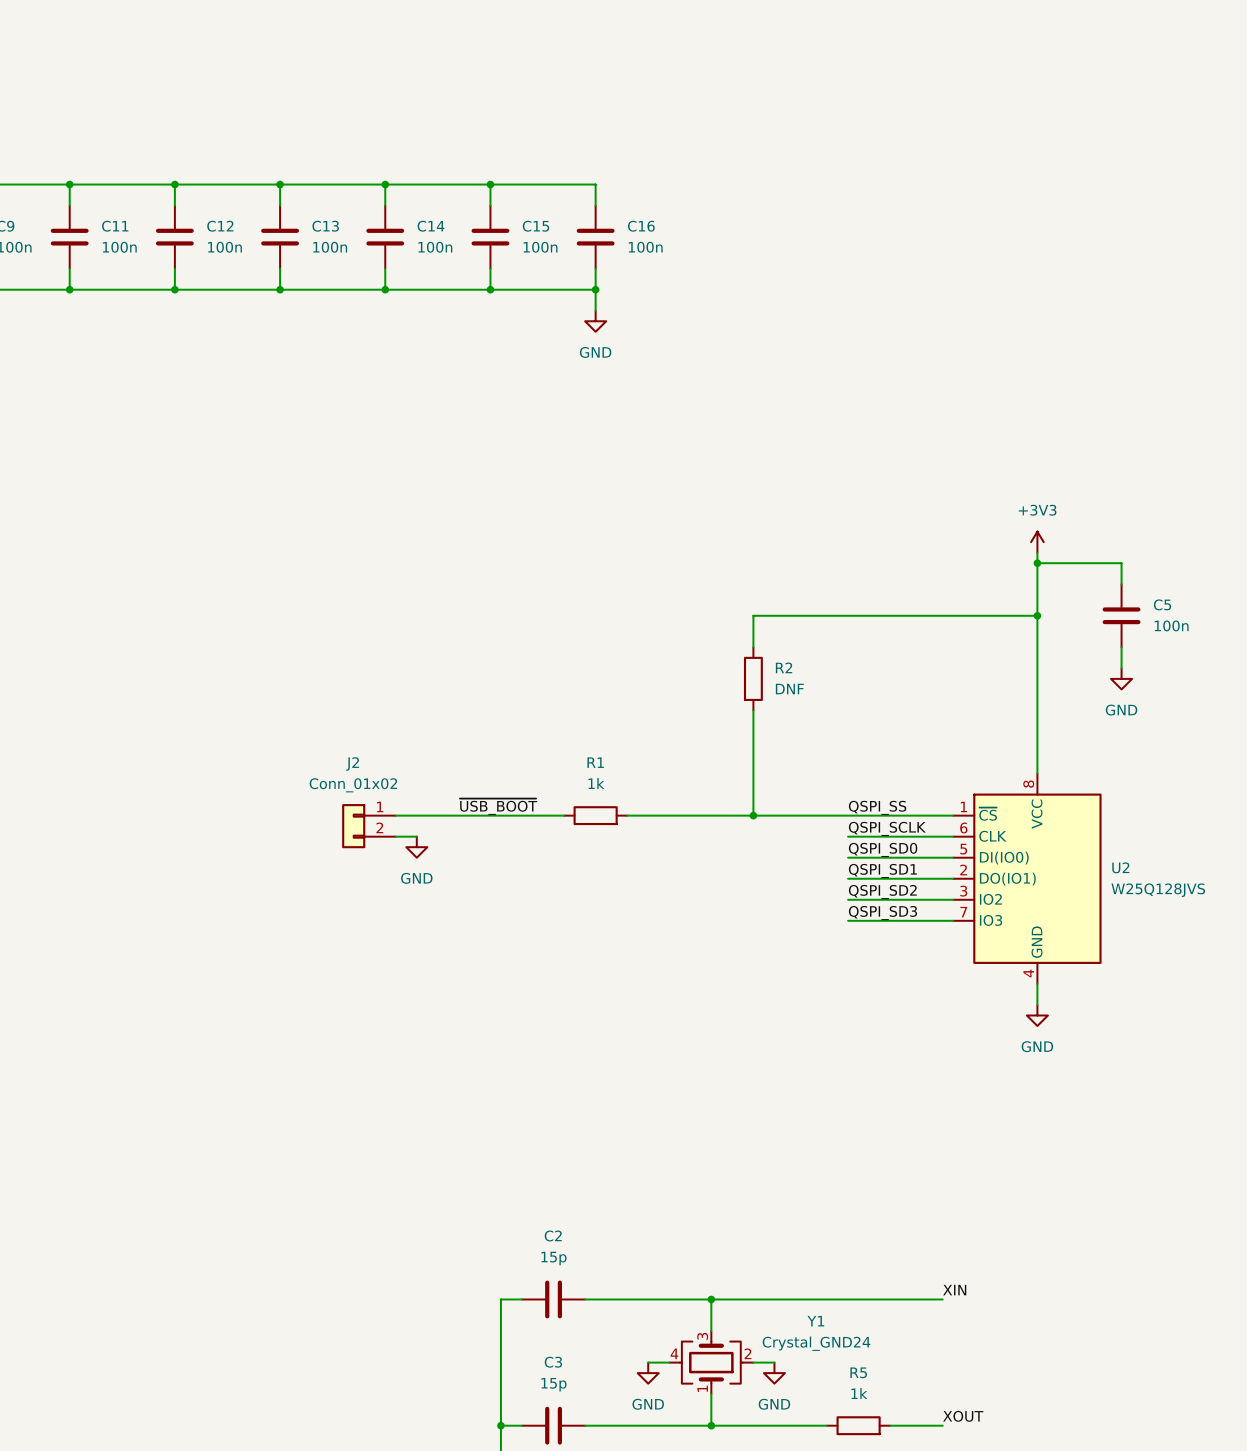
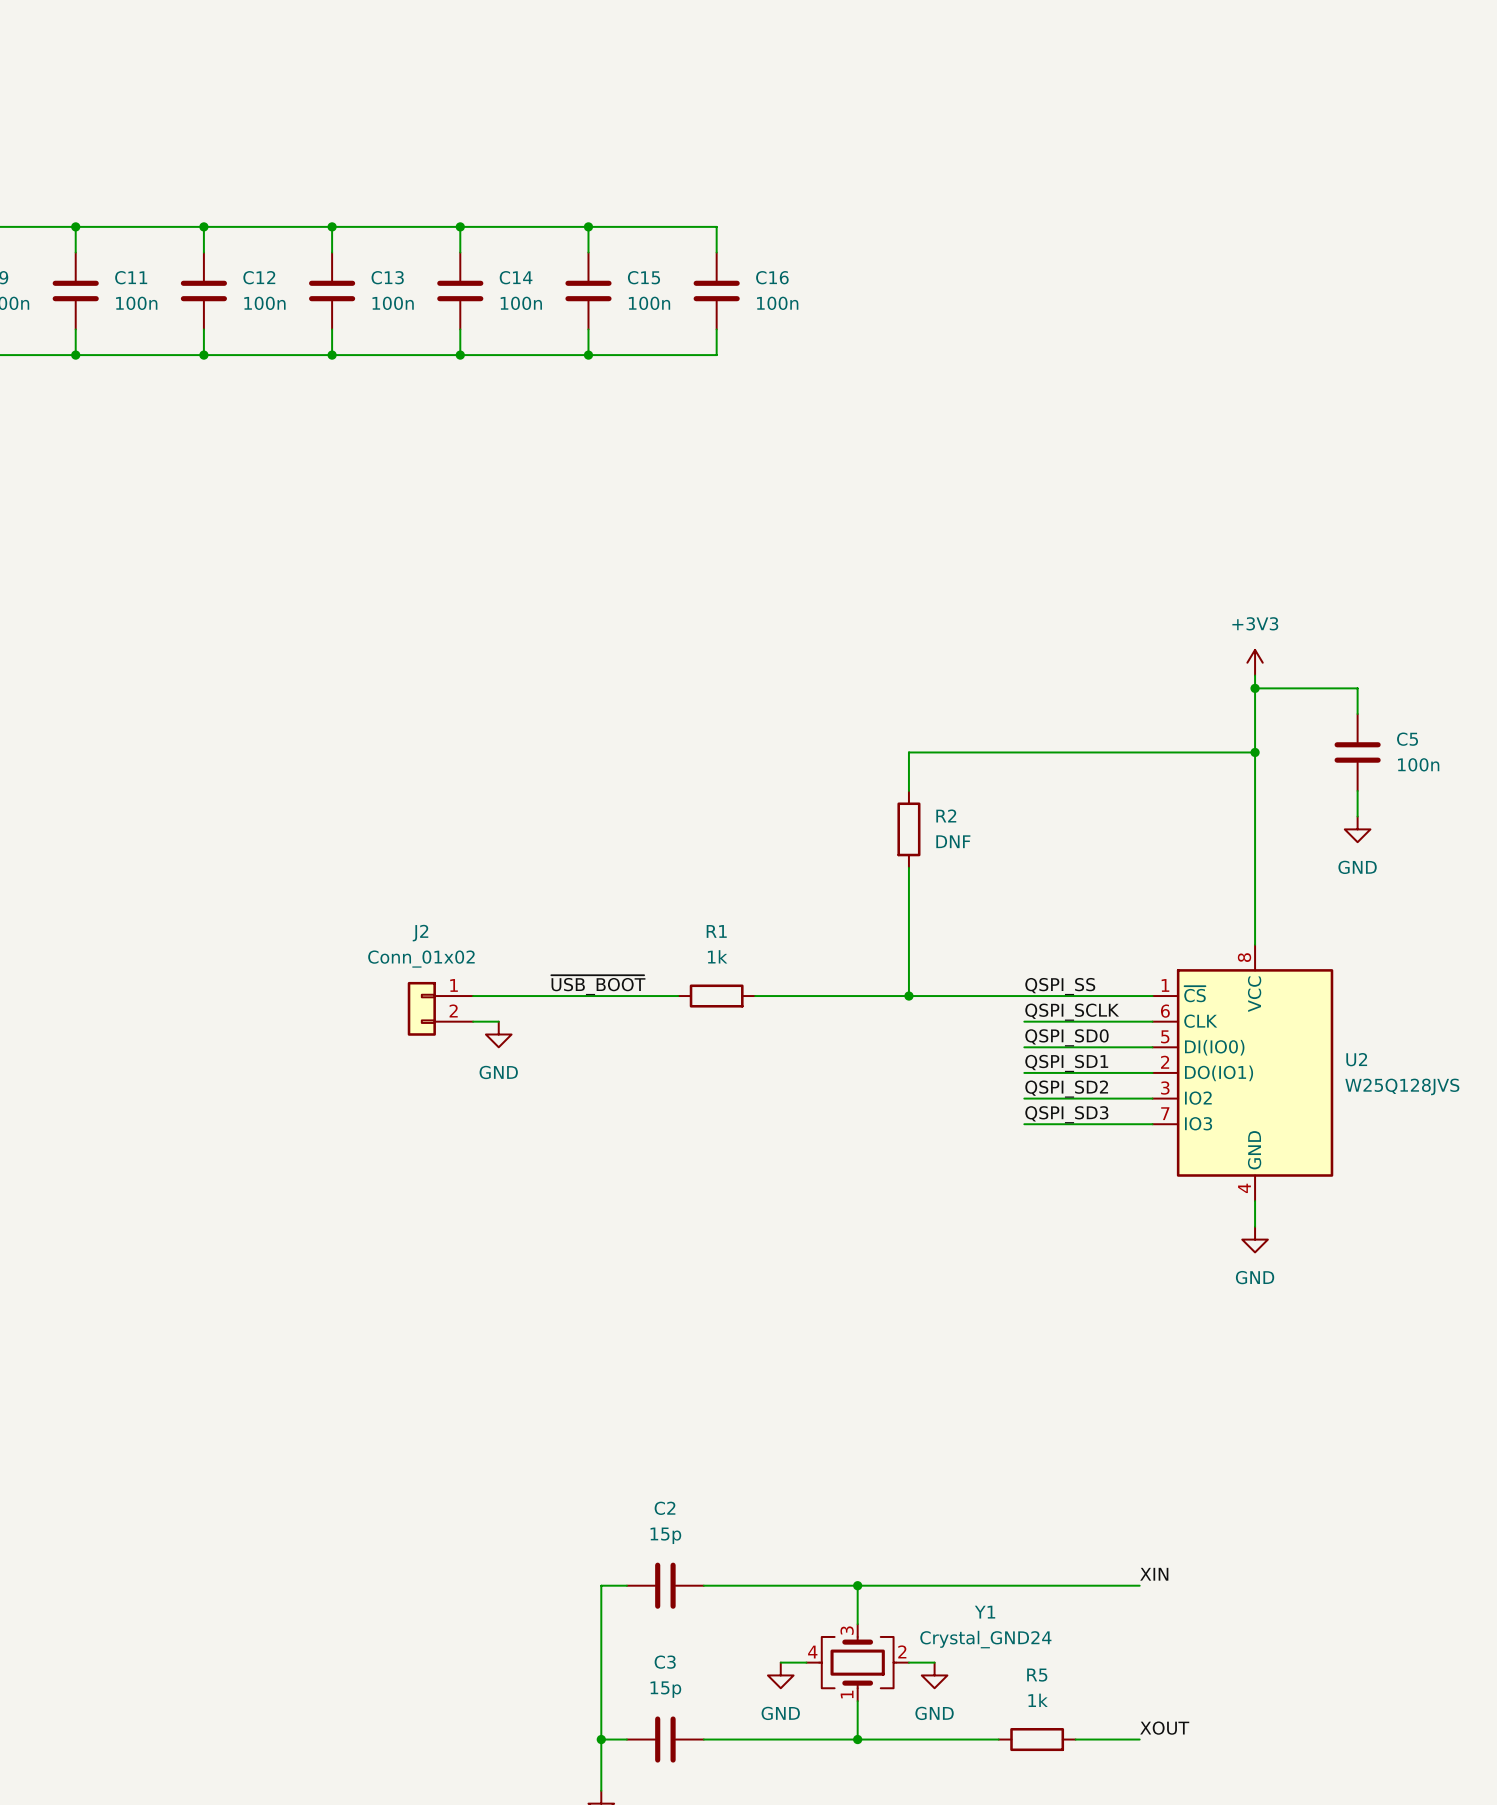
wire: (595, 289) (595, 310) -> none
junction: (595, 289) -> none
power symbol: GND (595, 321) -> none

